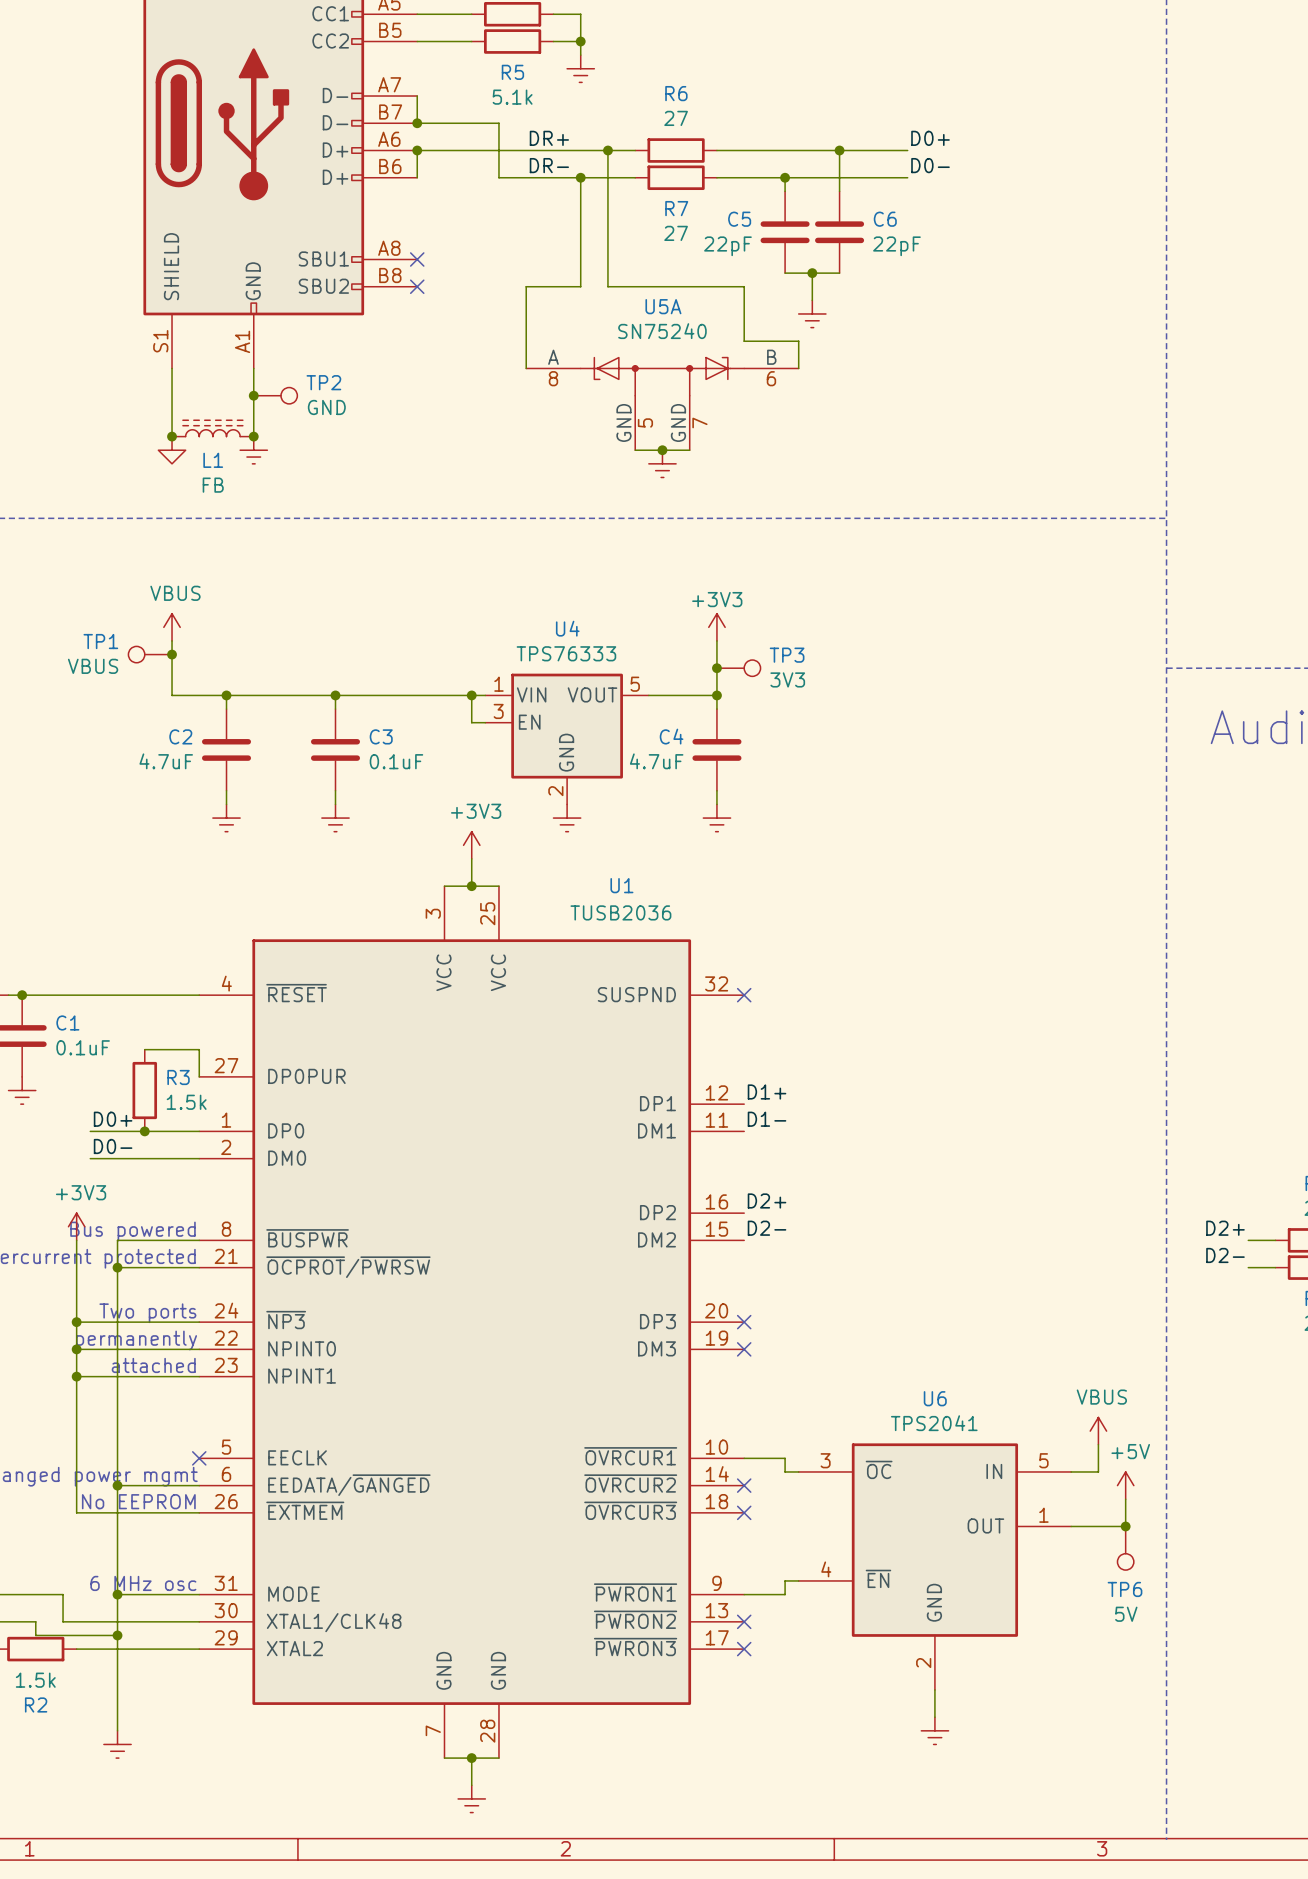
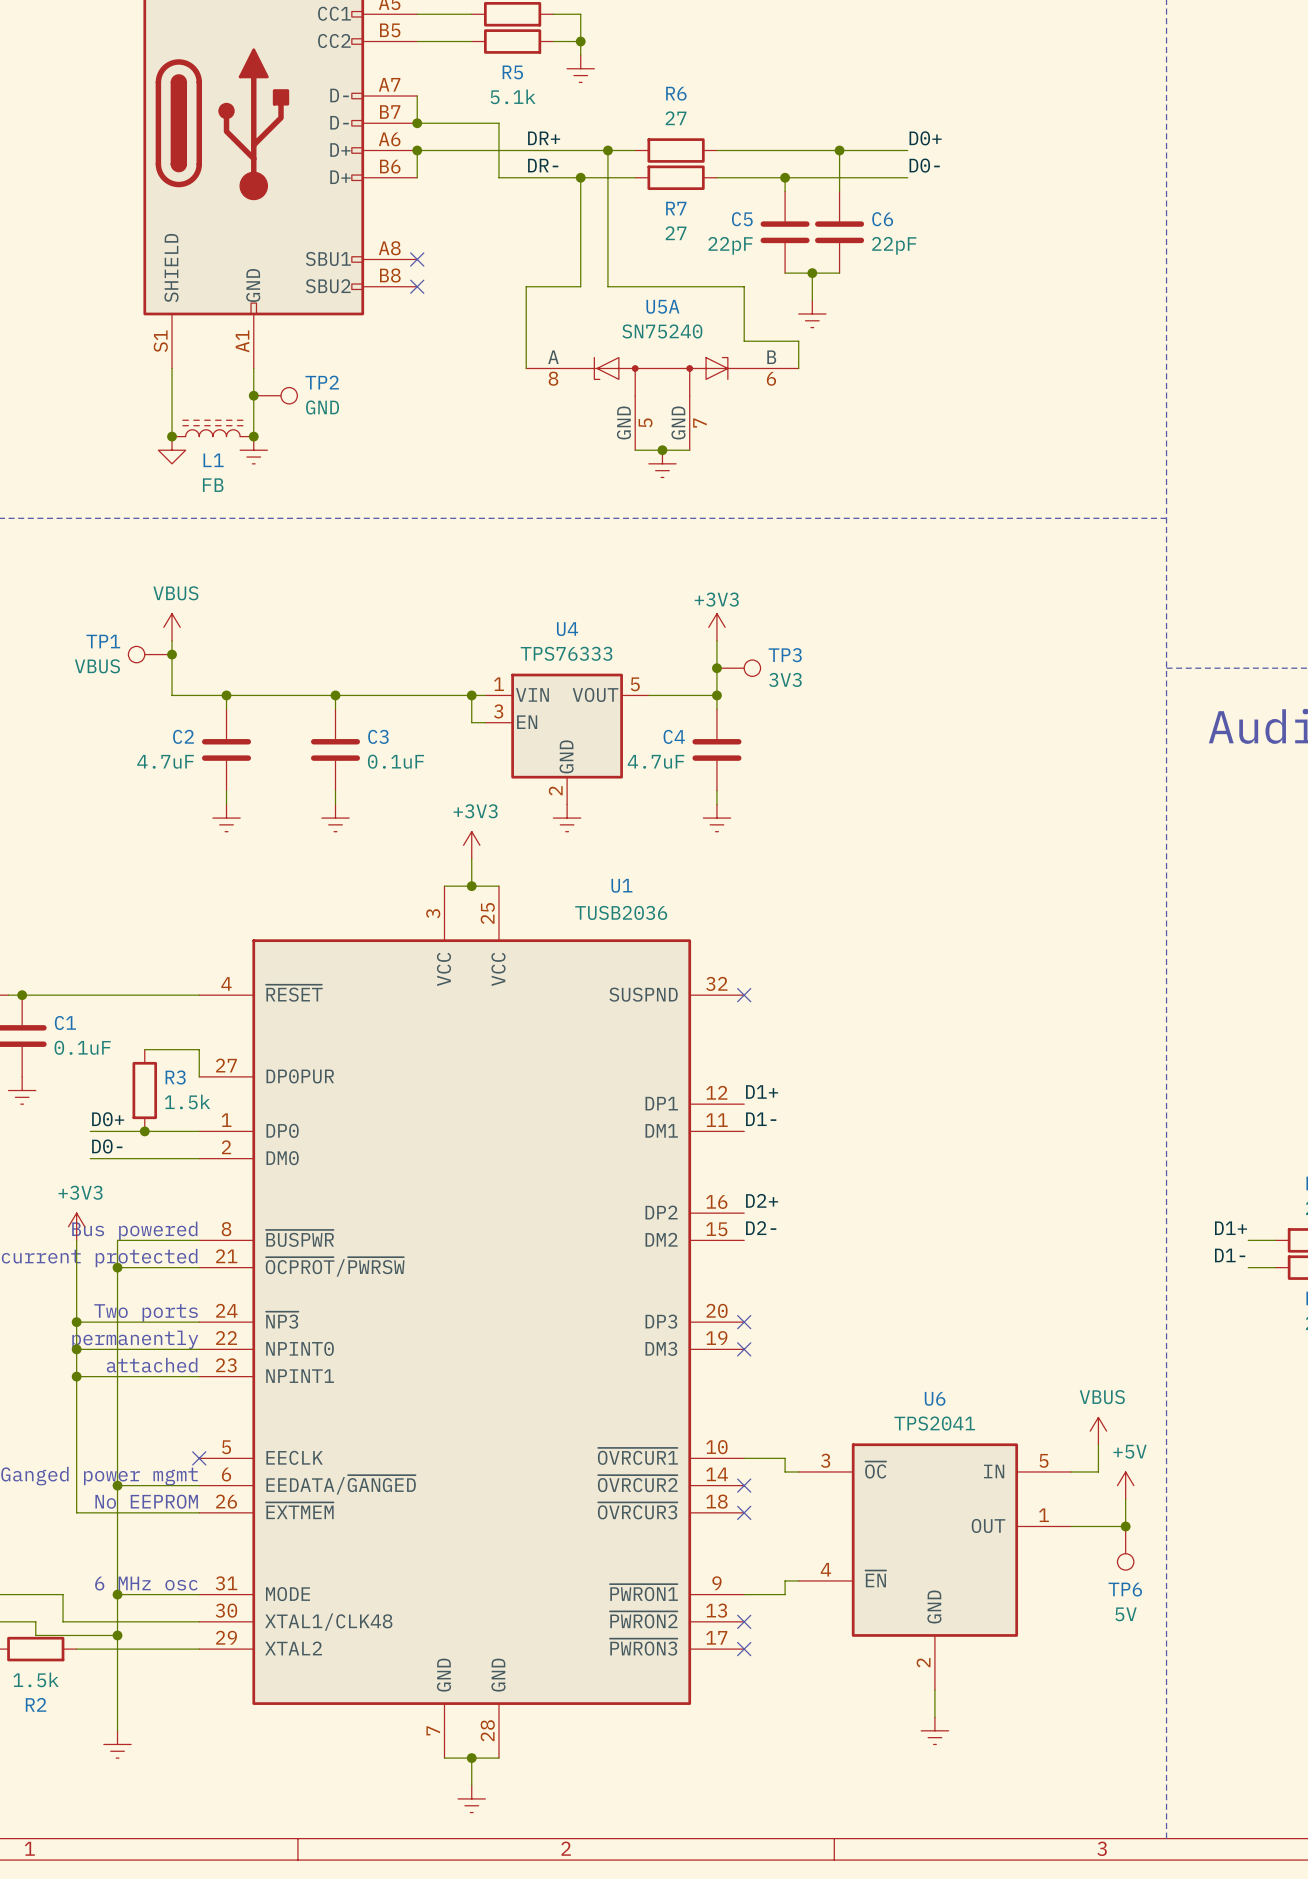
label: D2+ (1225, 1228) -> D1+ (1231, 1228)
label: D2- (1225, 1255) -> D1- (1230, 1255)

